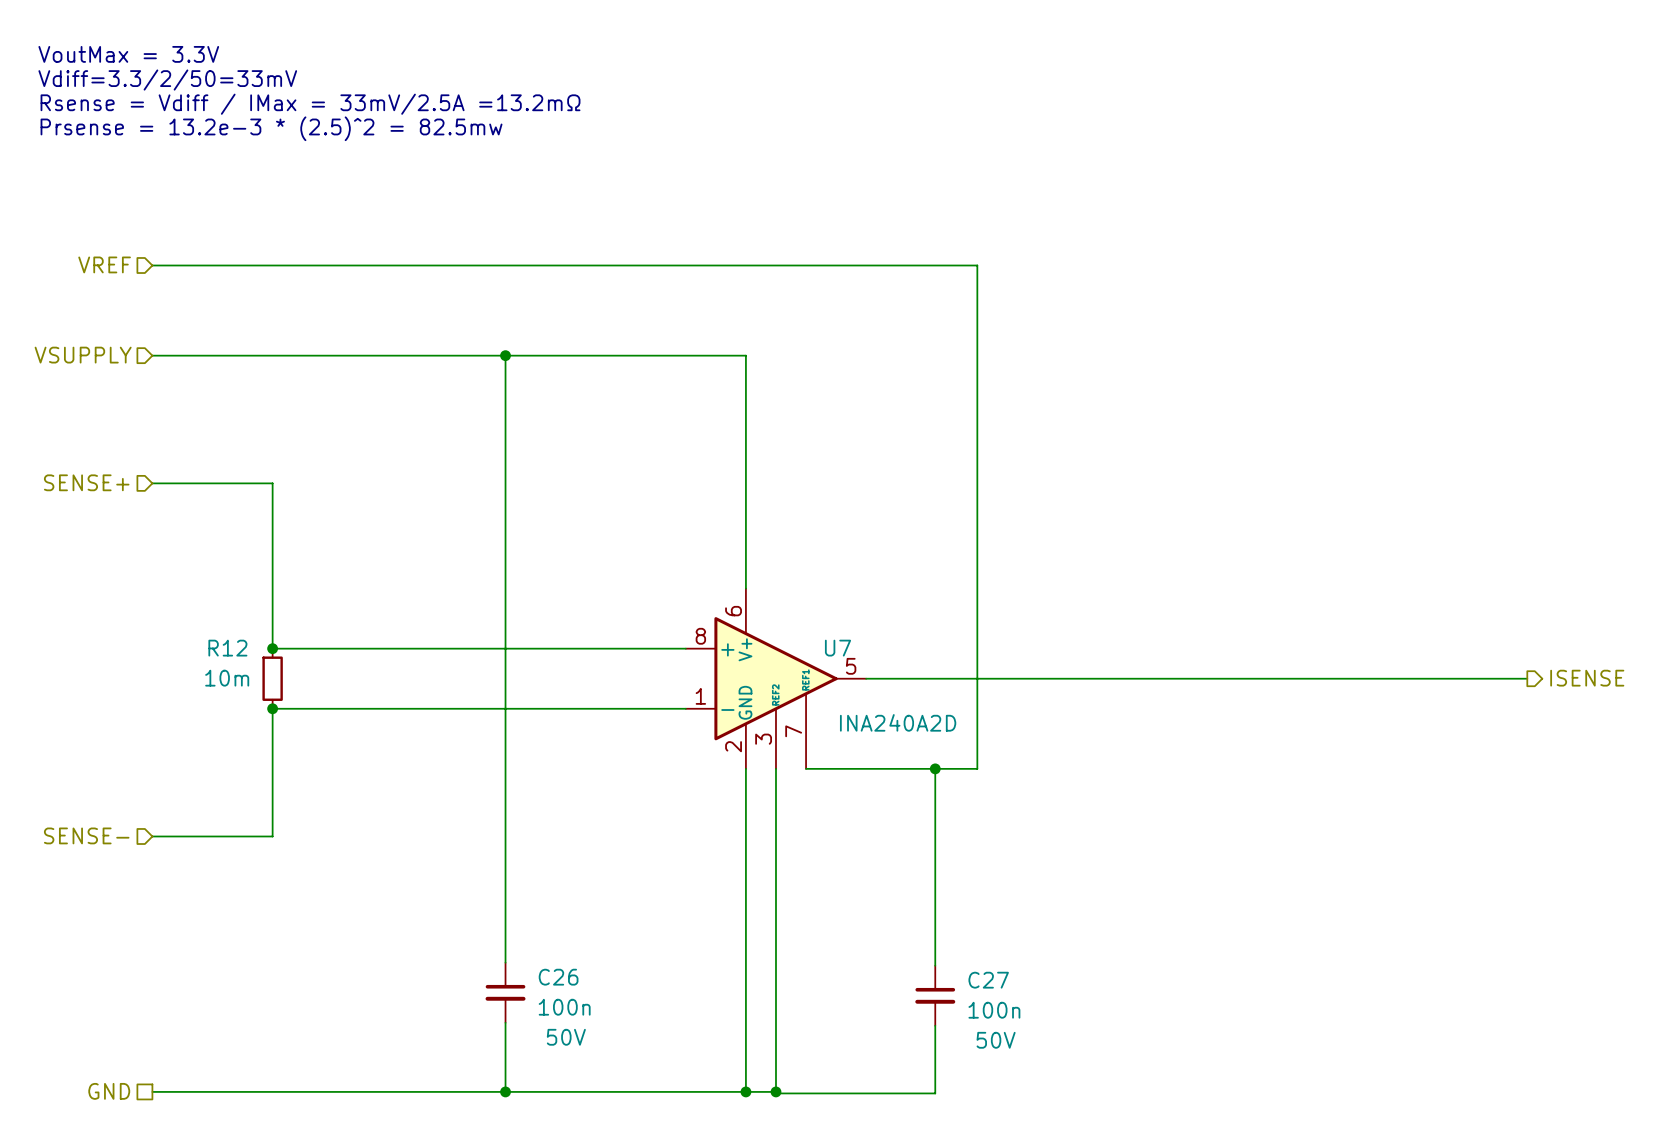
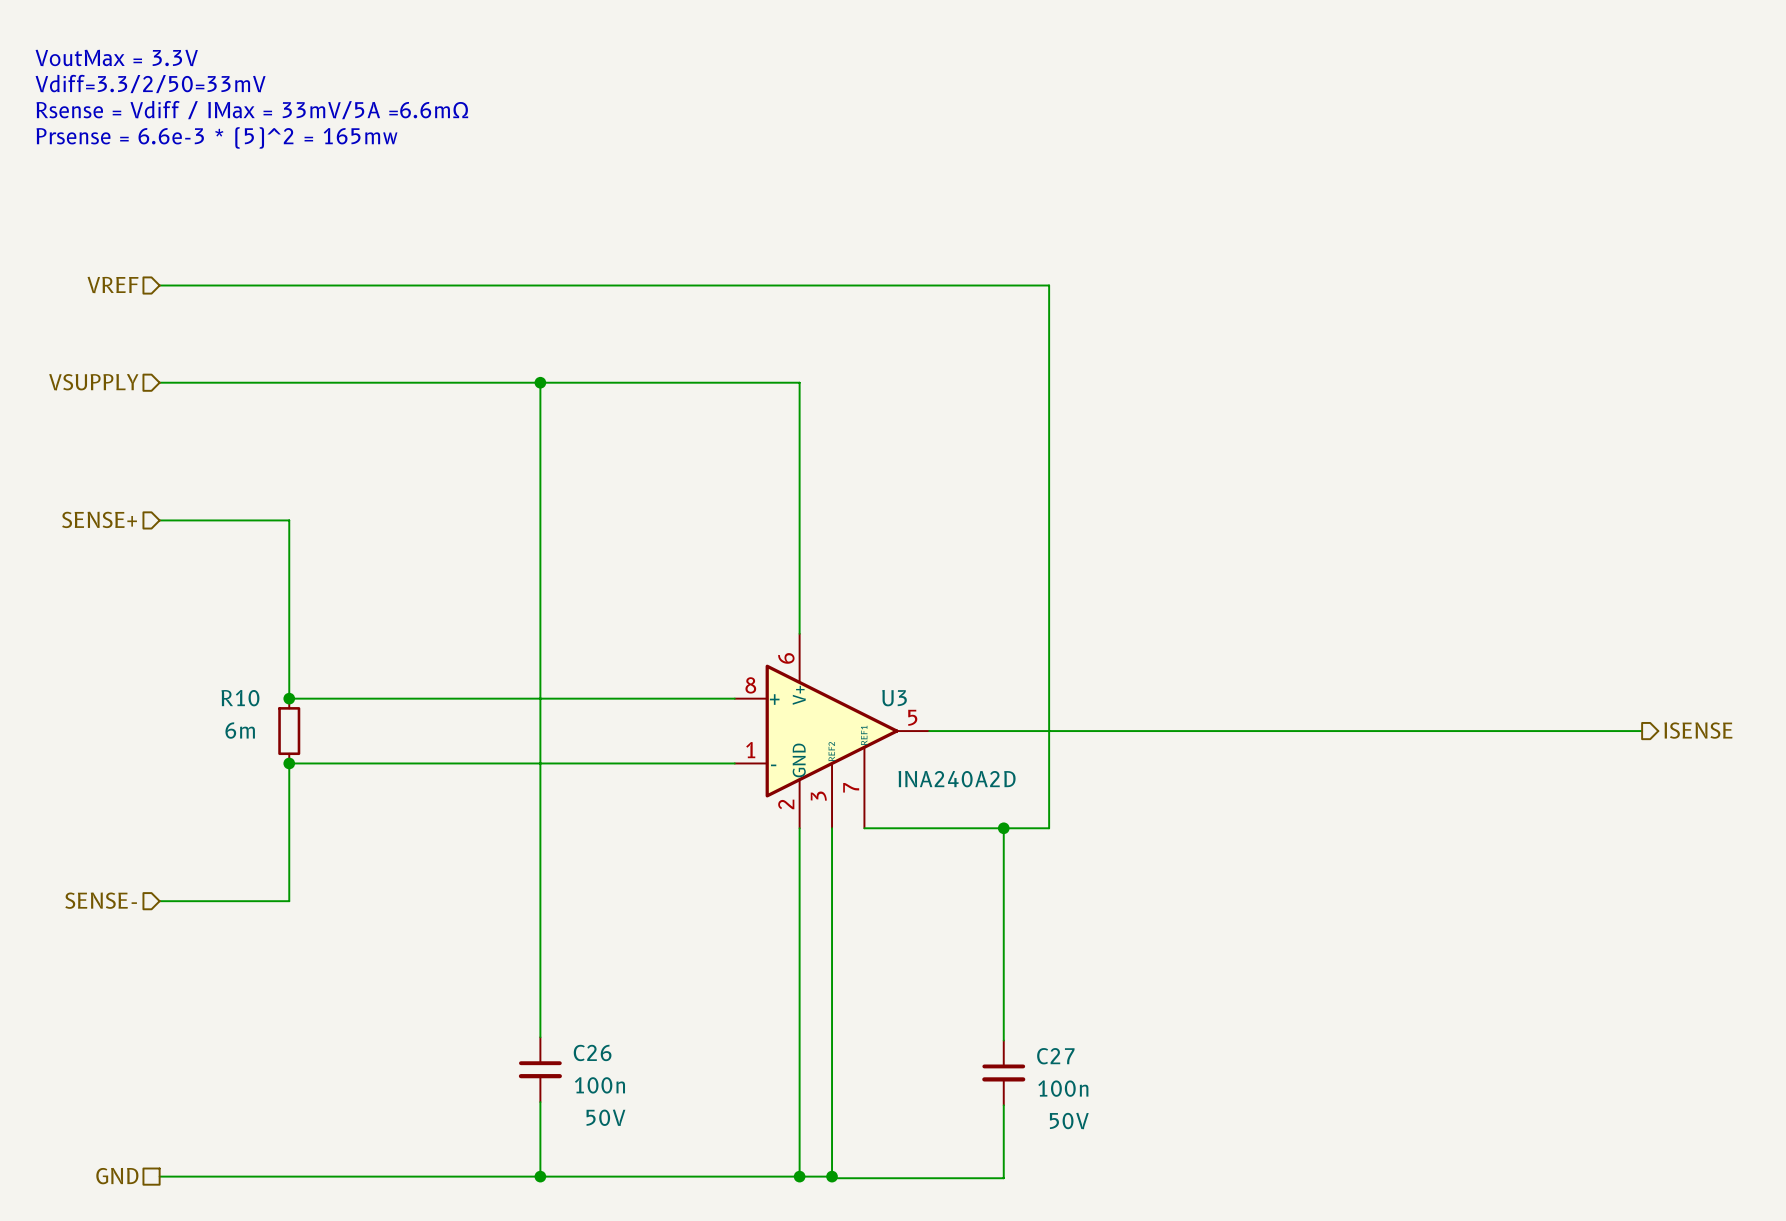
text: Rsense = Vdiff / IMax = 33mV/2.5A =13.2mΩ (310, 104) -> Rsense = Vdiff / IMax = 33mV/5A =6.6mΩ (252, 110)
text: Prsense = 13.2e-3 * (2.5)^2 = 82.5mw (271, 128) -> Prsense = 6.6e-3 * (5)^2 = 165mw (216, 137)
R12 name: R12 (227, 648) -> R10 (240, 698)
U7 name: U7 (838, 648) -> U3 (894, 698)
R12 value: 10m (227, 678) -> 6m (240, 730)

